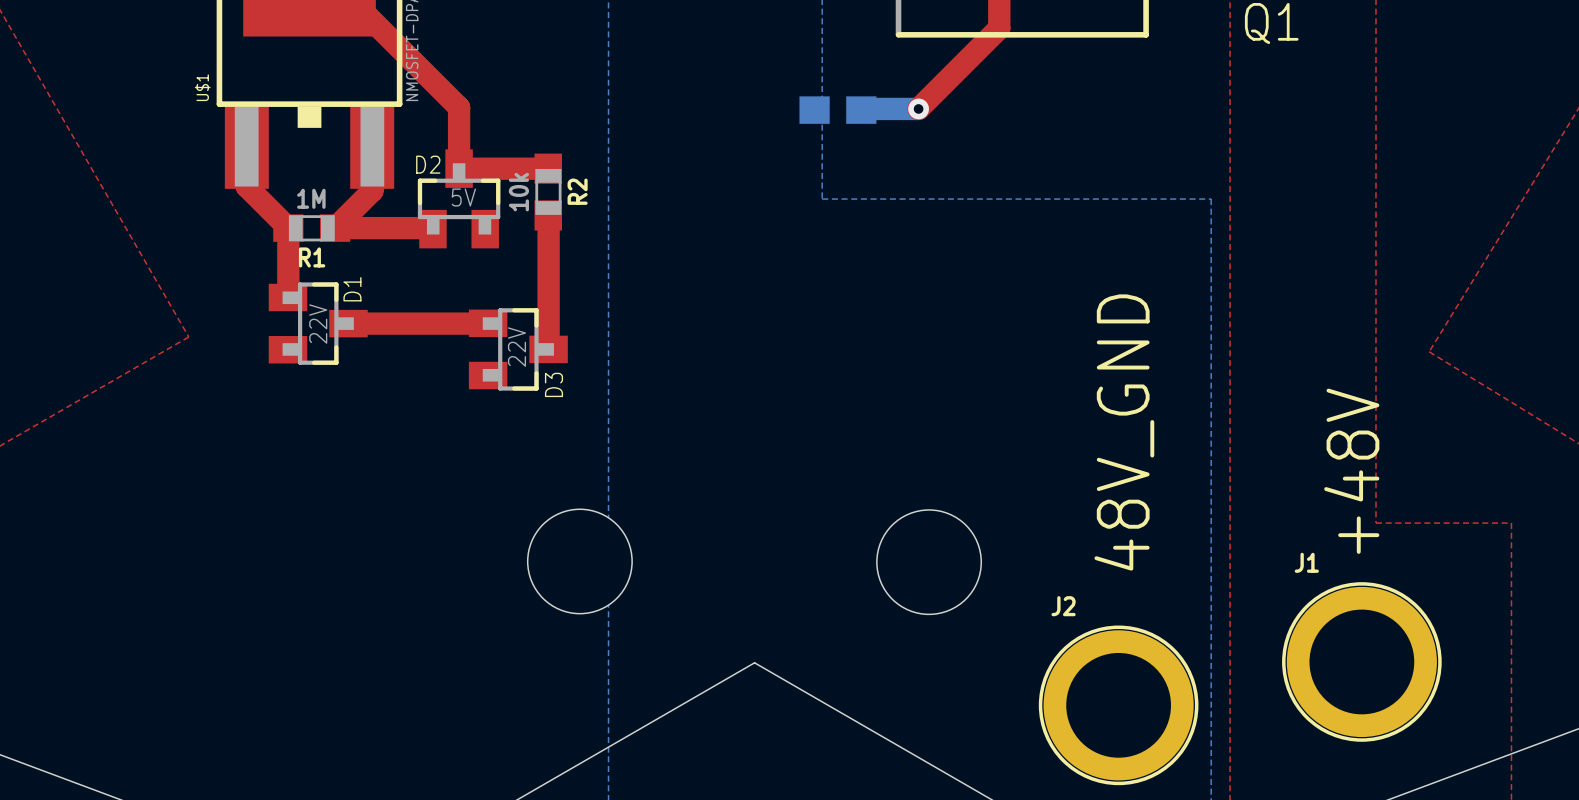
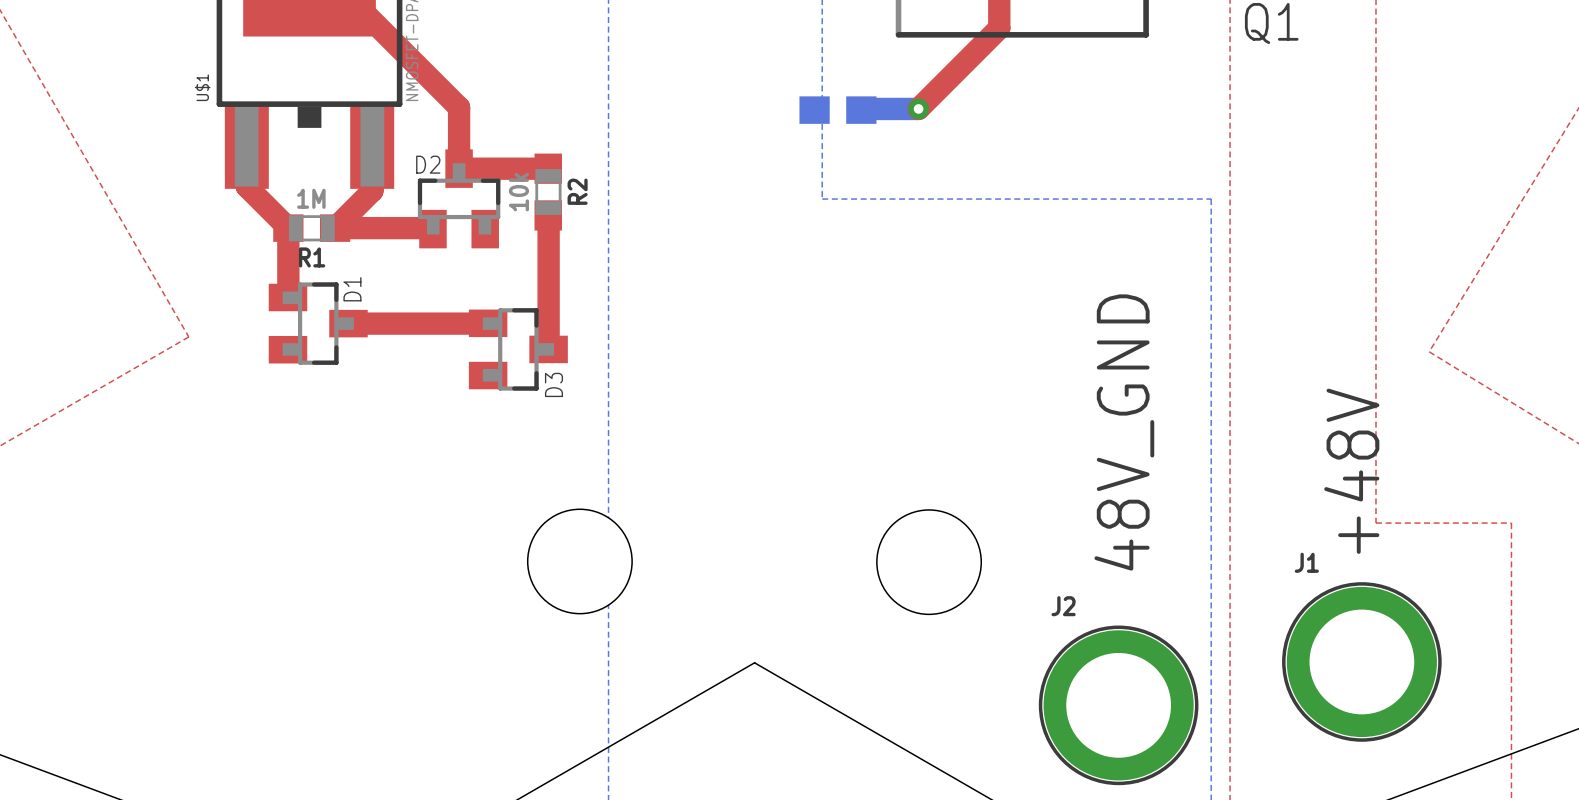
D2 value: 5V (463, 197) -> none
D1 value: 22V (318, 324) -> none
D3 value: 22V (516, 347) -> none

